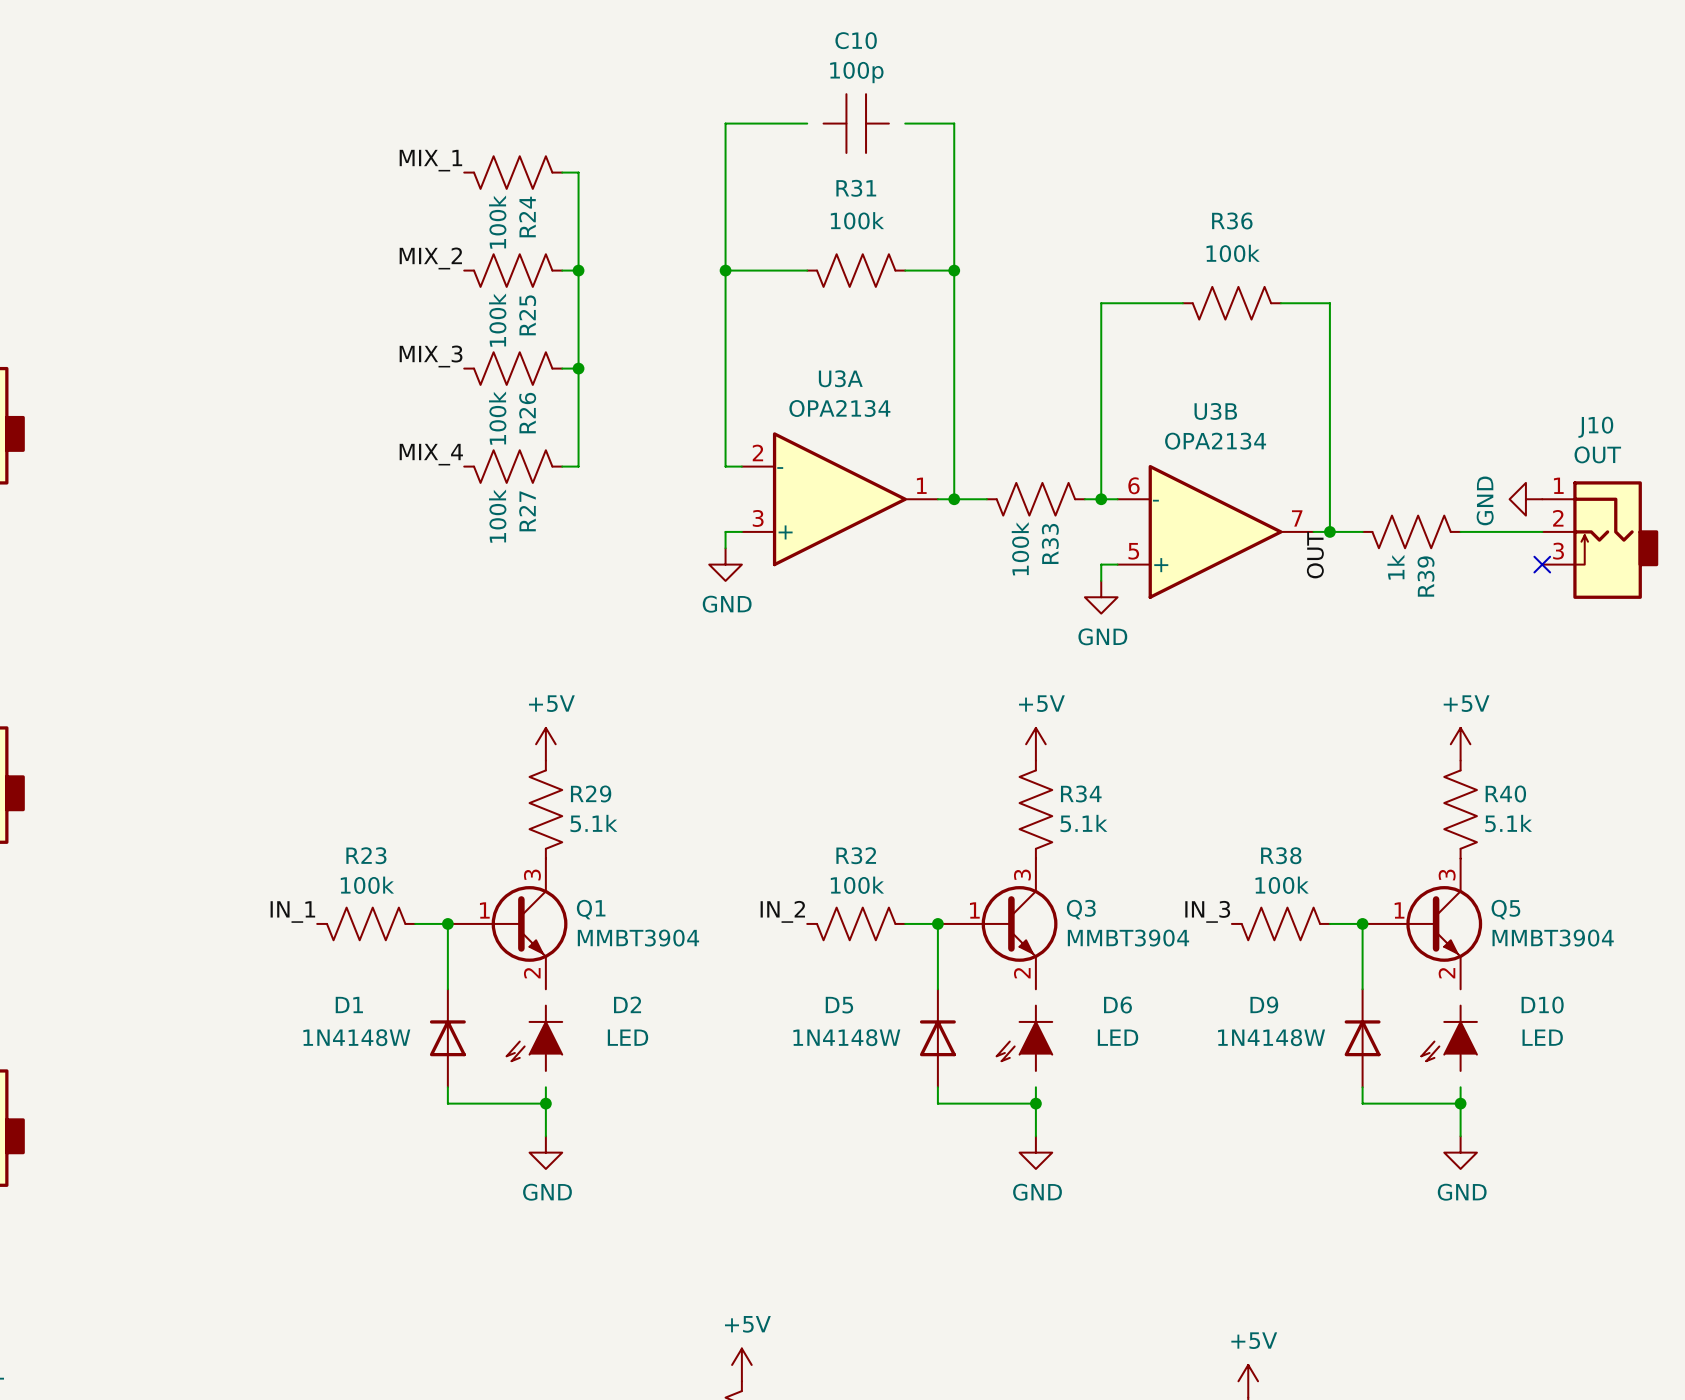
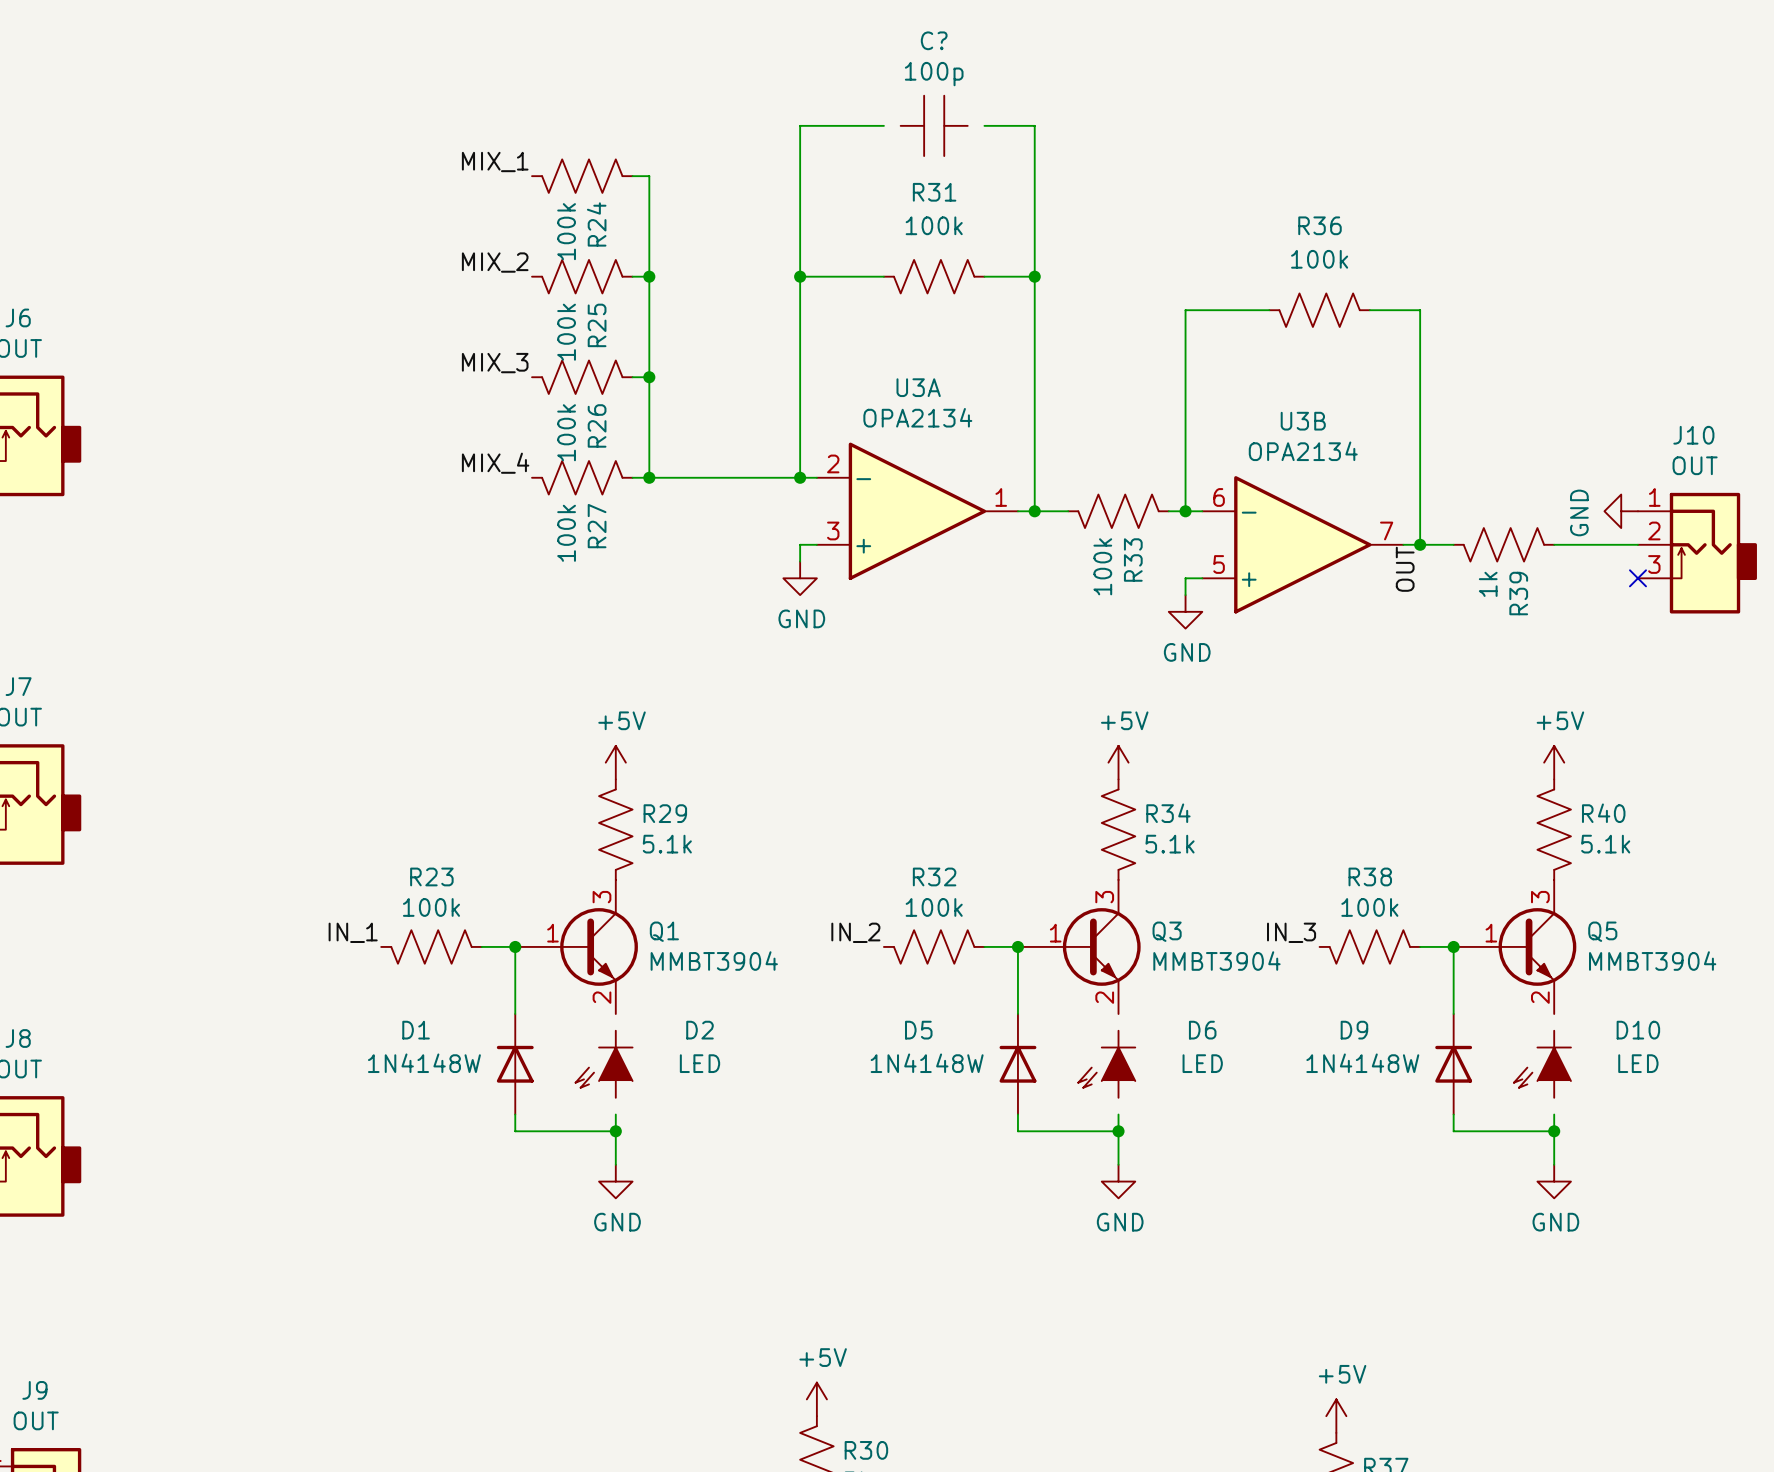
C10 name: C10 (856, 40) -> C? (934, 40)
wire: none -> (649, 477) (800, 477)
junction: none -> (649, 477)
junction: none -> (800, 477)

